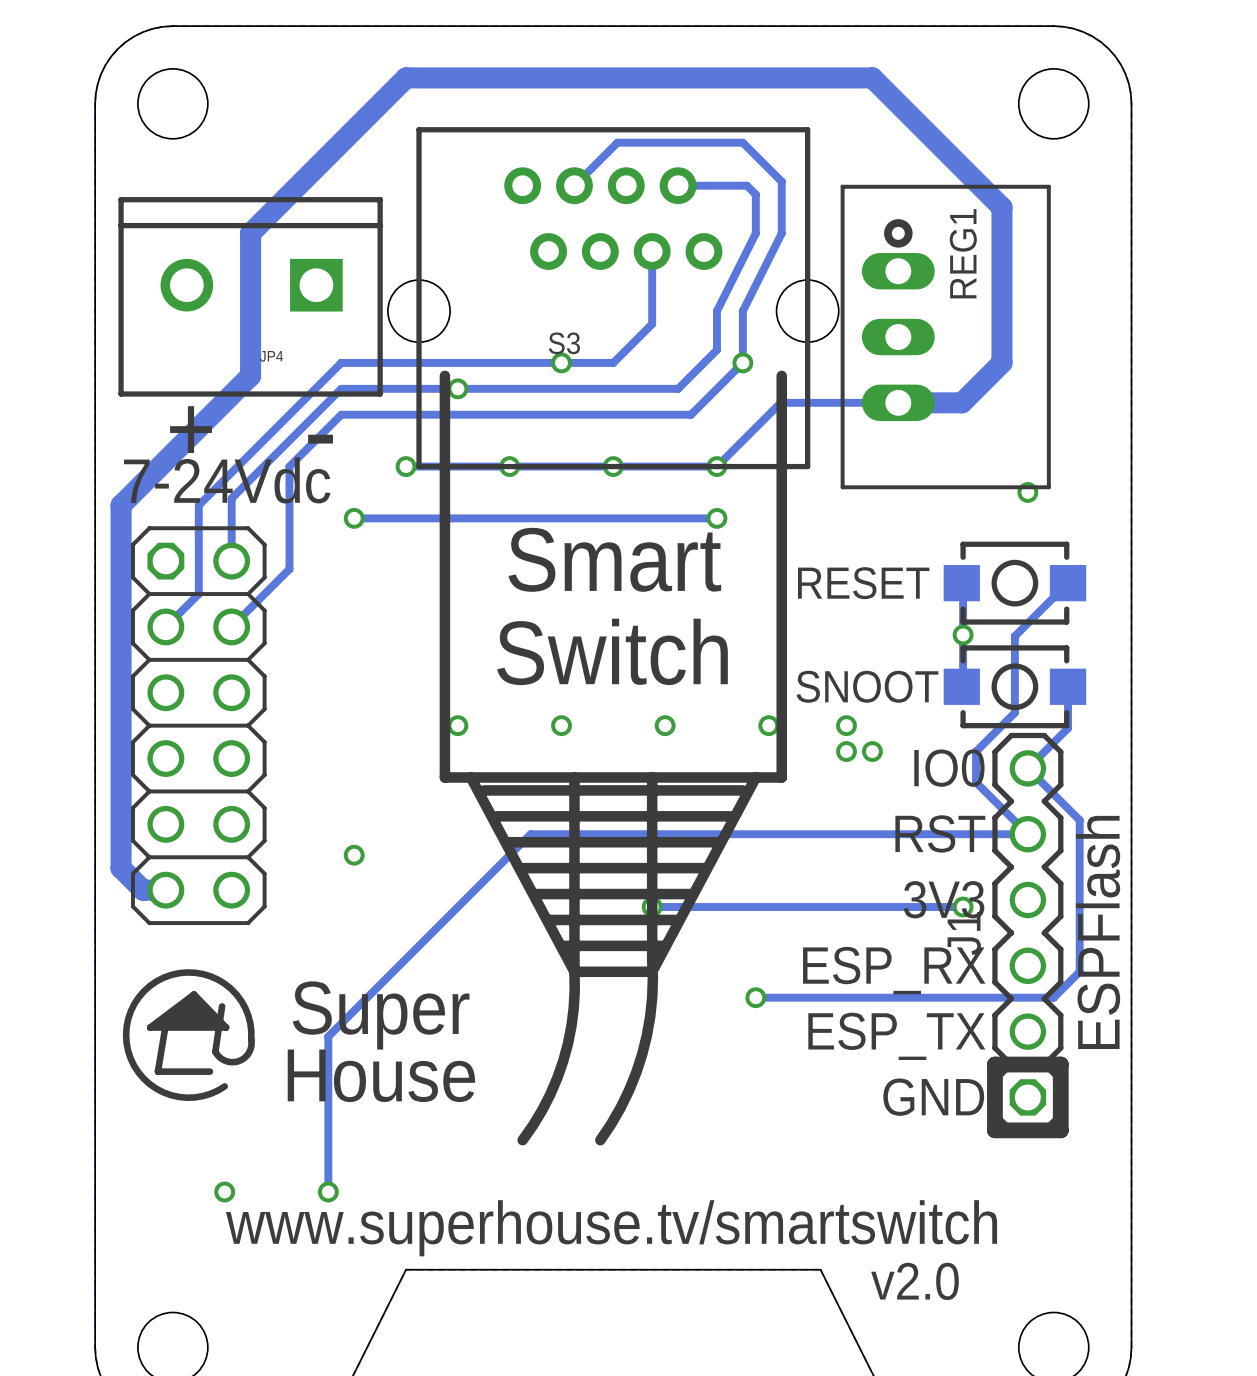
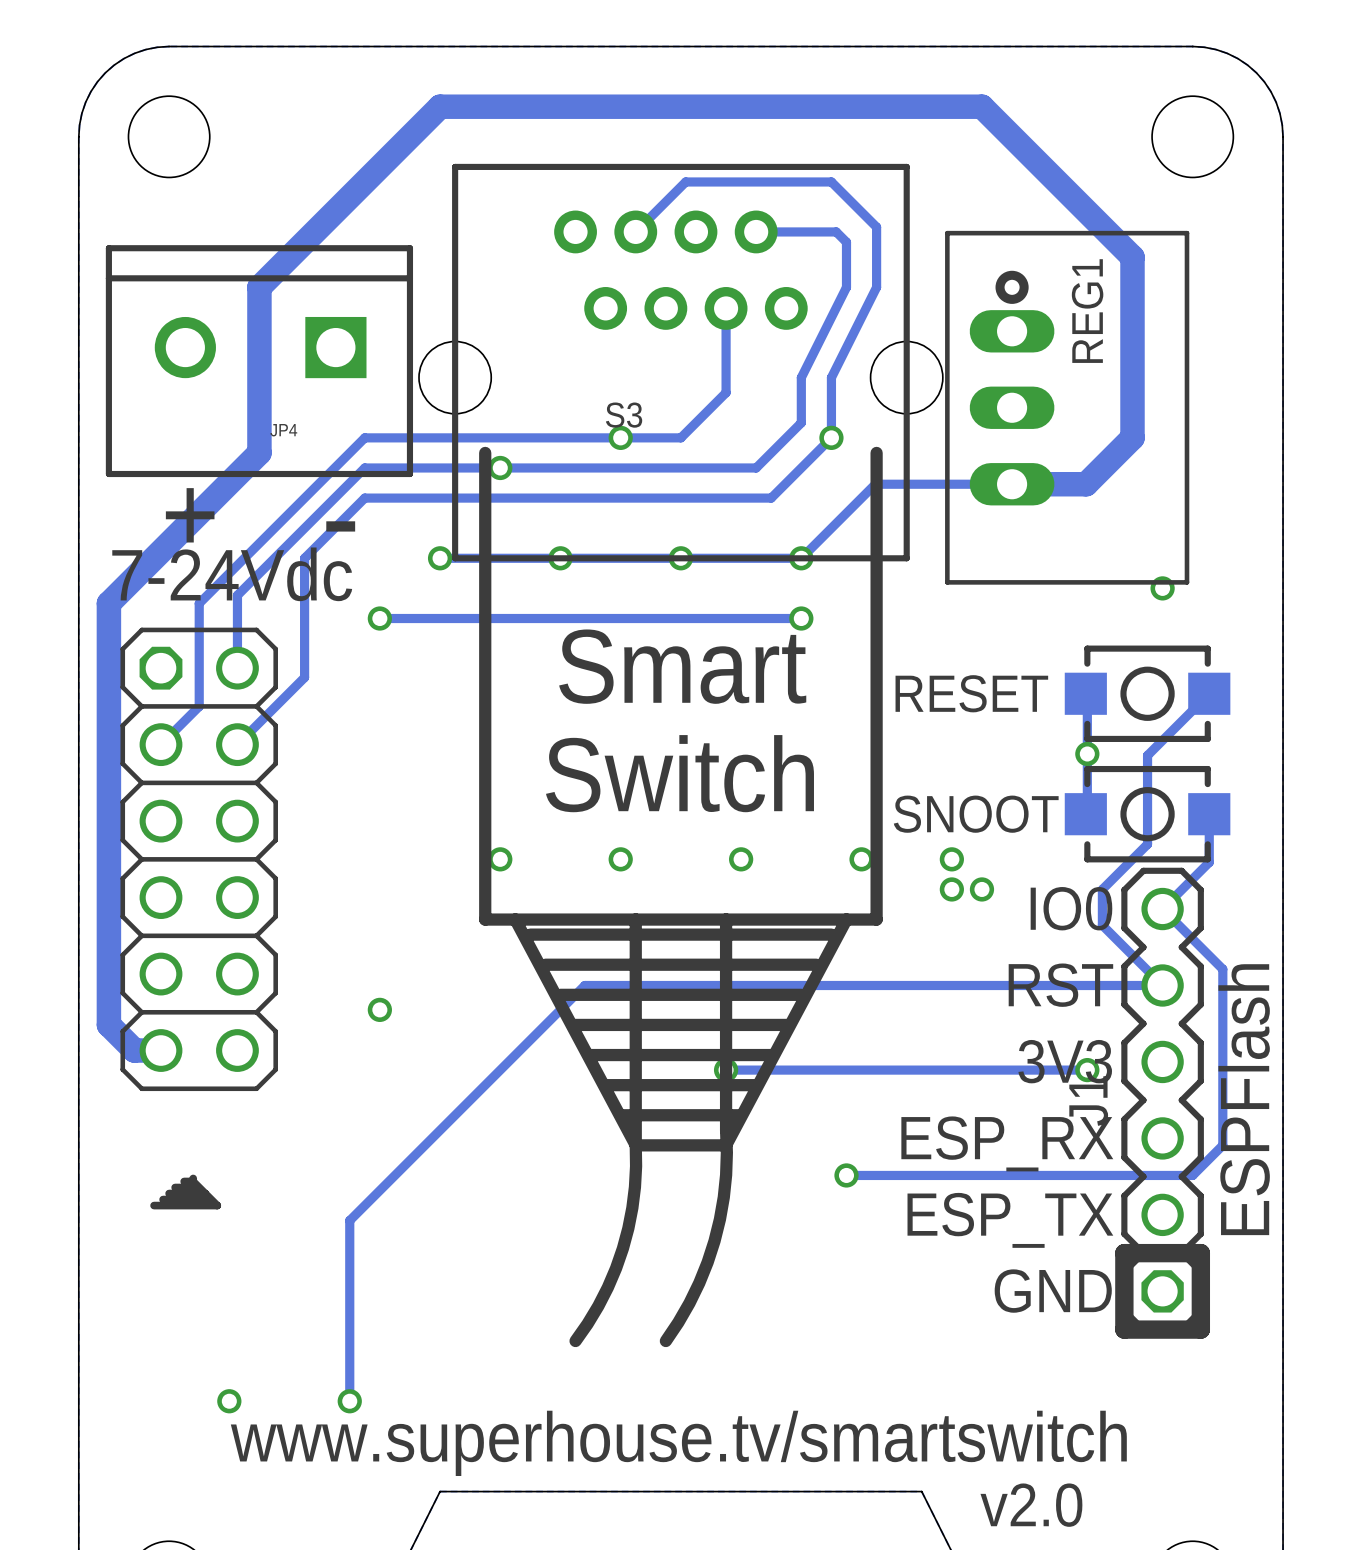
line: (194, 994) (150, 1027) (226, 1027) (194, 994) -> none
line: (222, 1006) (215, 1051) (226, 1061) (238, 1061) (248, 1053) (251, 1044) (250, 1023) (245, 1008) (236, 994) (225, 983) (203, 974) (179, 973) (163, 977) (149, 985) (138, 997) (130, 1011) (126, 1034) (128, 1050) (134, 1065) (143, 1078) (156, 1088) (170, 1095) (194, 1097) (210, 1093) (224, 1086) -> none
line: (167, 1015) (157, 1071) (209, 1071) -> none
text: Super (381, 1015) -> none
text: House (381, 1075) -> none

